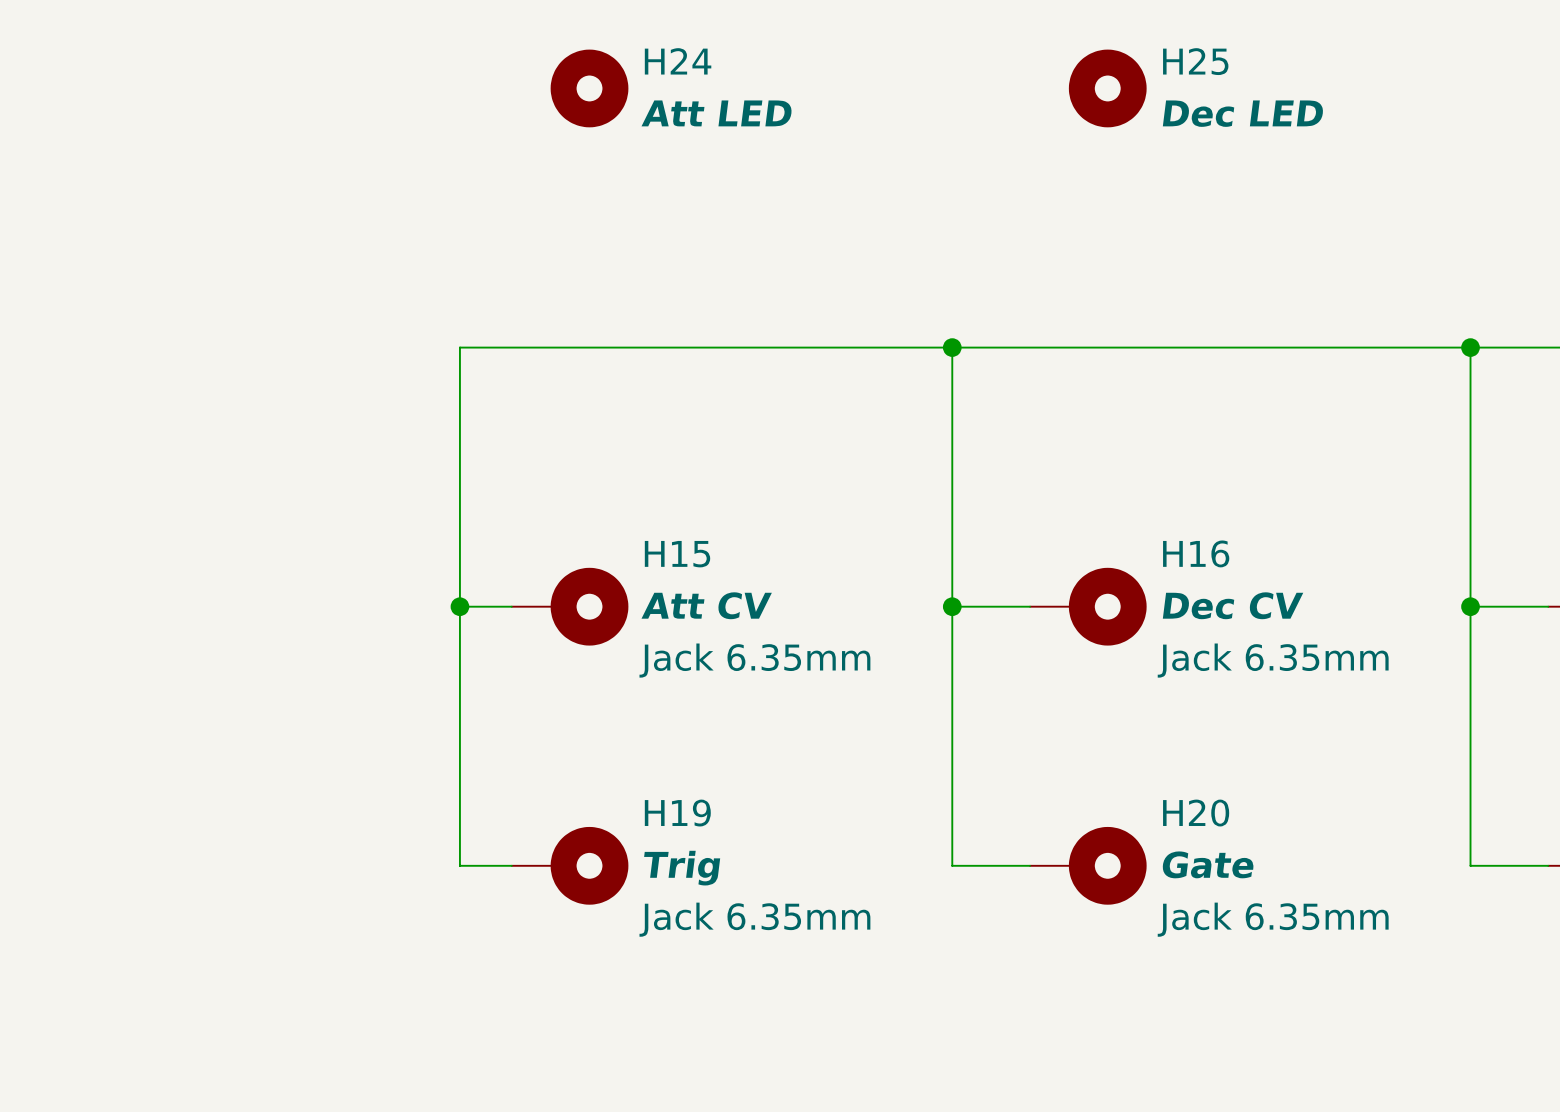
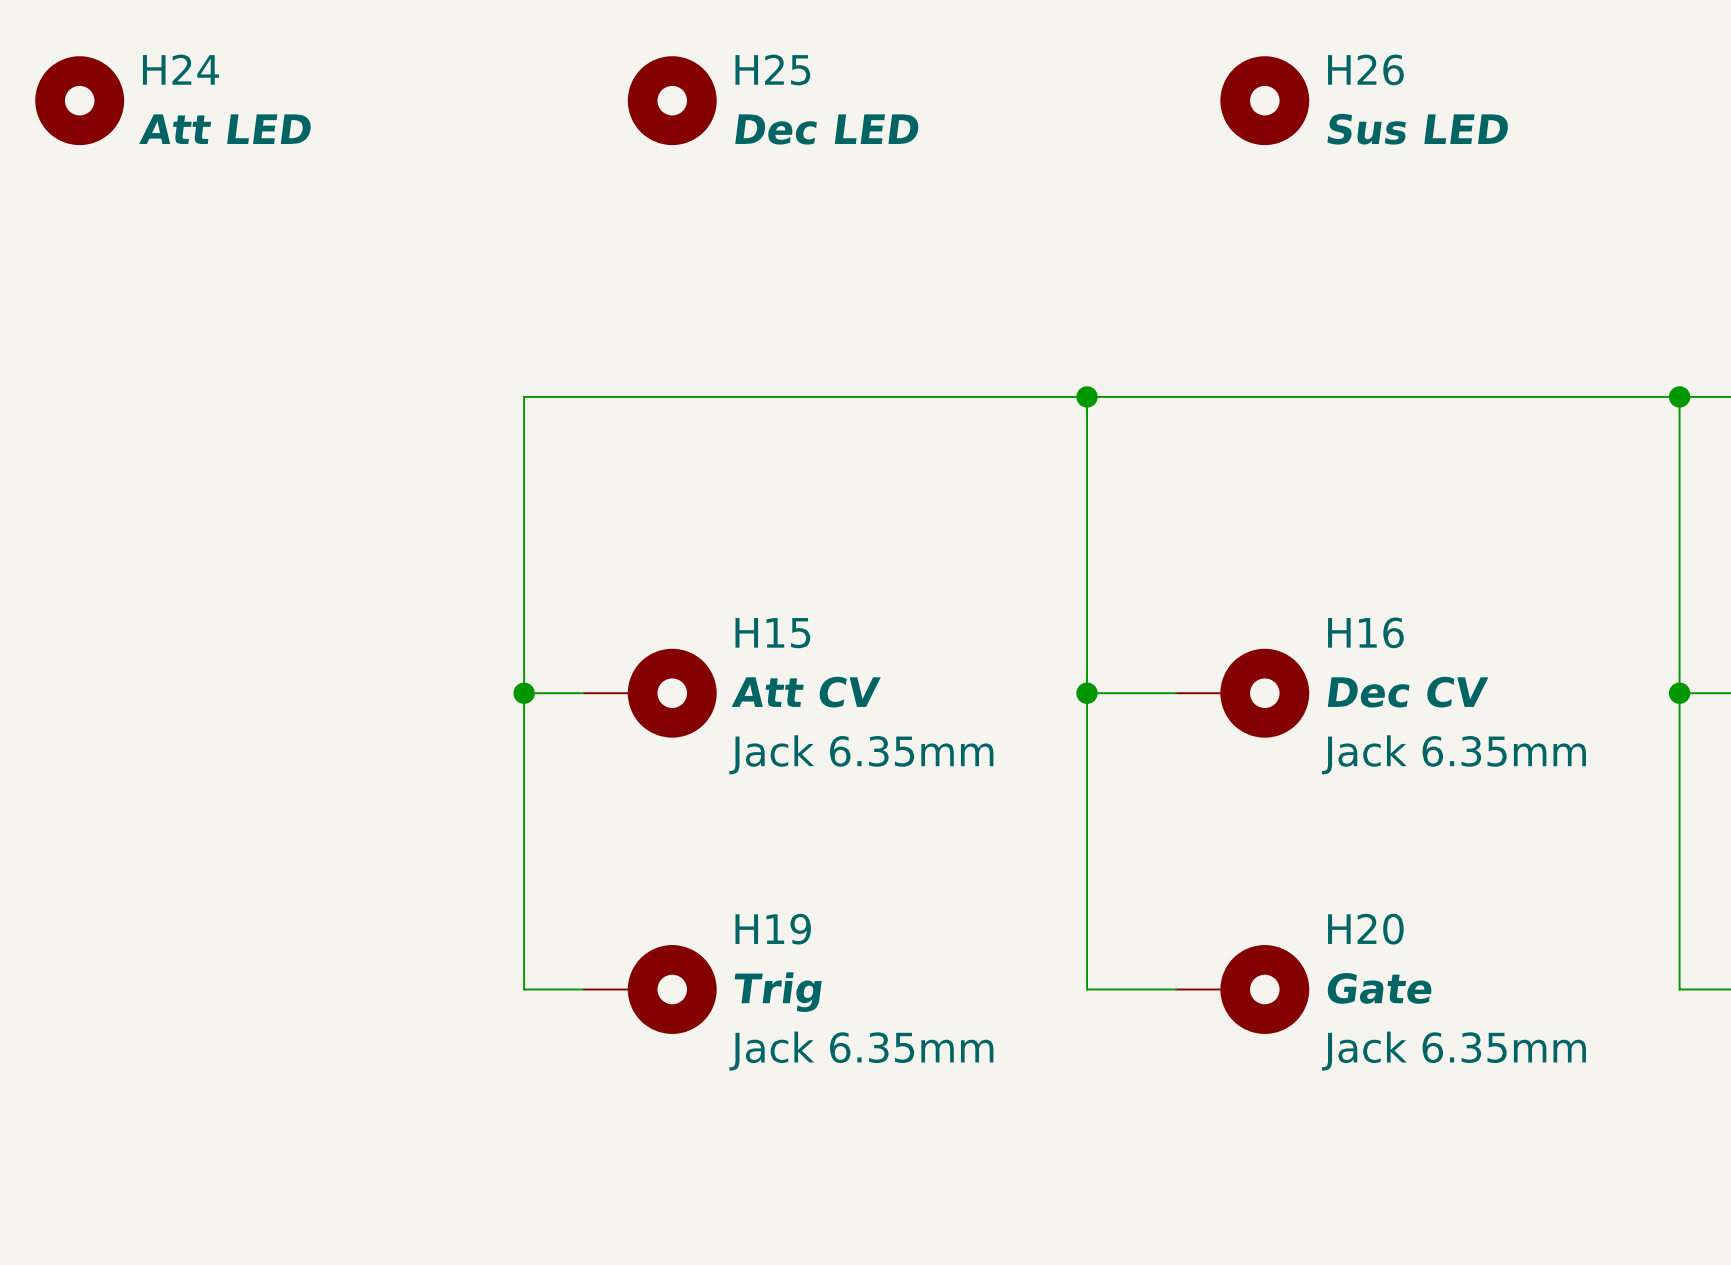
H24 name: H24 (678, 61) -> H25 (772, 69)
H25 name: H25 (1195, 61) -> H26 (1365, 69)
H24: none -> Att LED (79, 100)
H24 value: Att LED (716, 113) -> Dec LED (826, 129)
H25 value: Dec LED (1243, 113) -> Sus LED (1417, 129)

